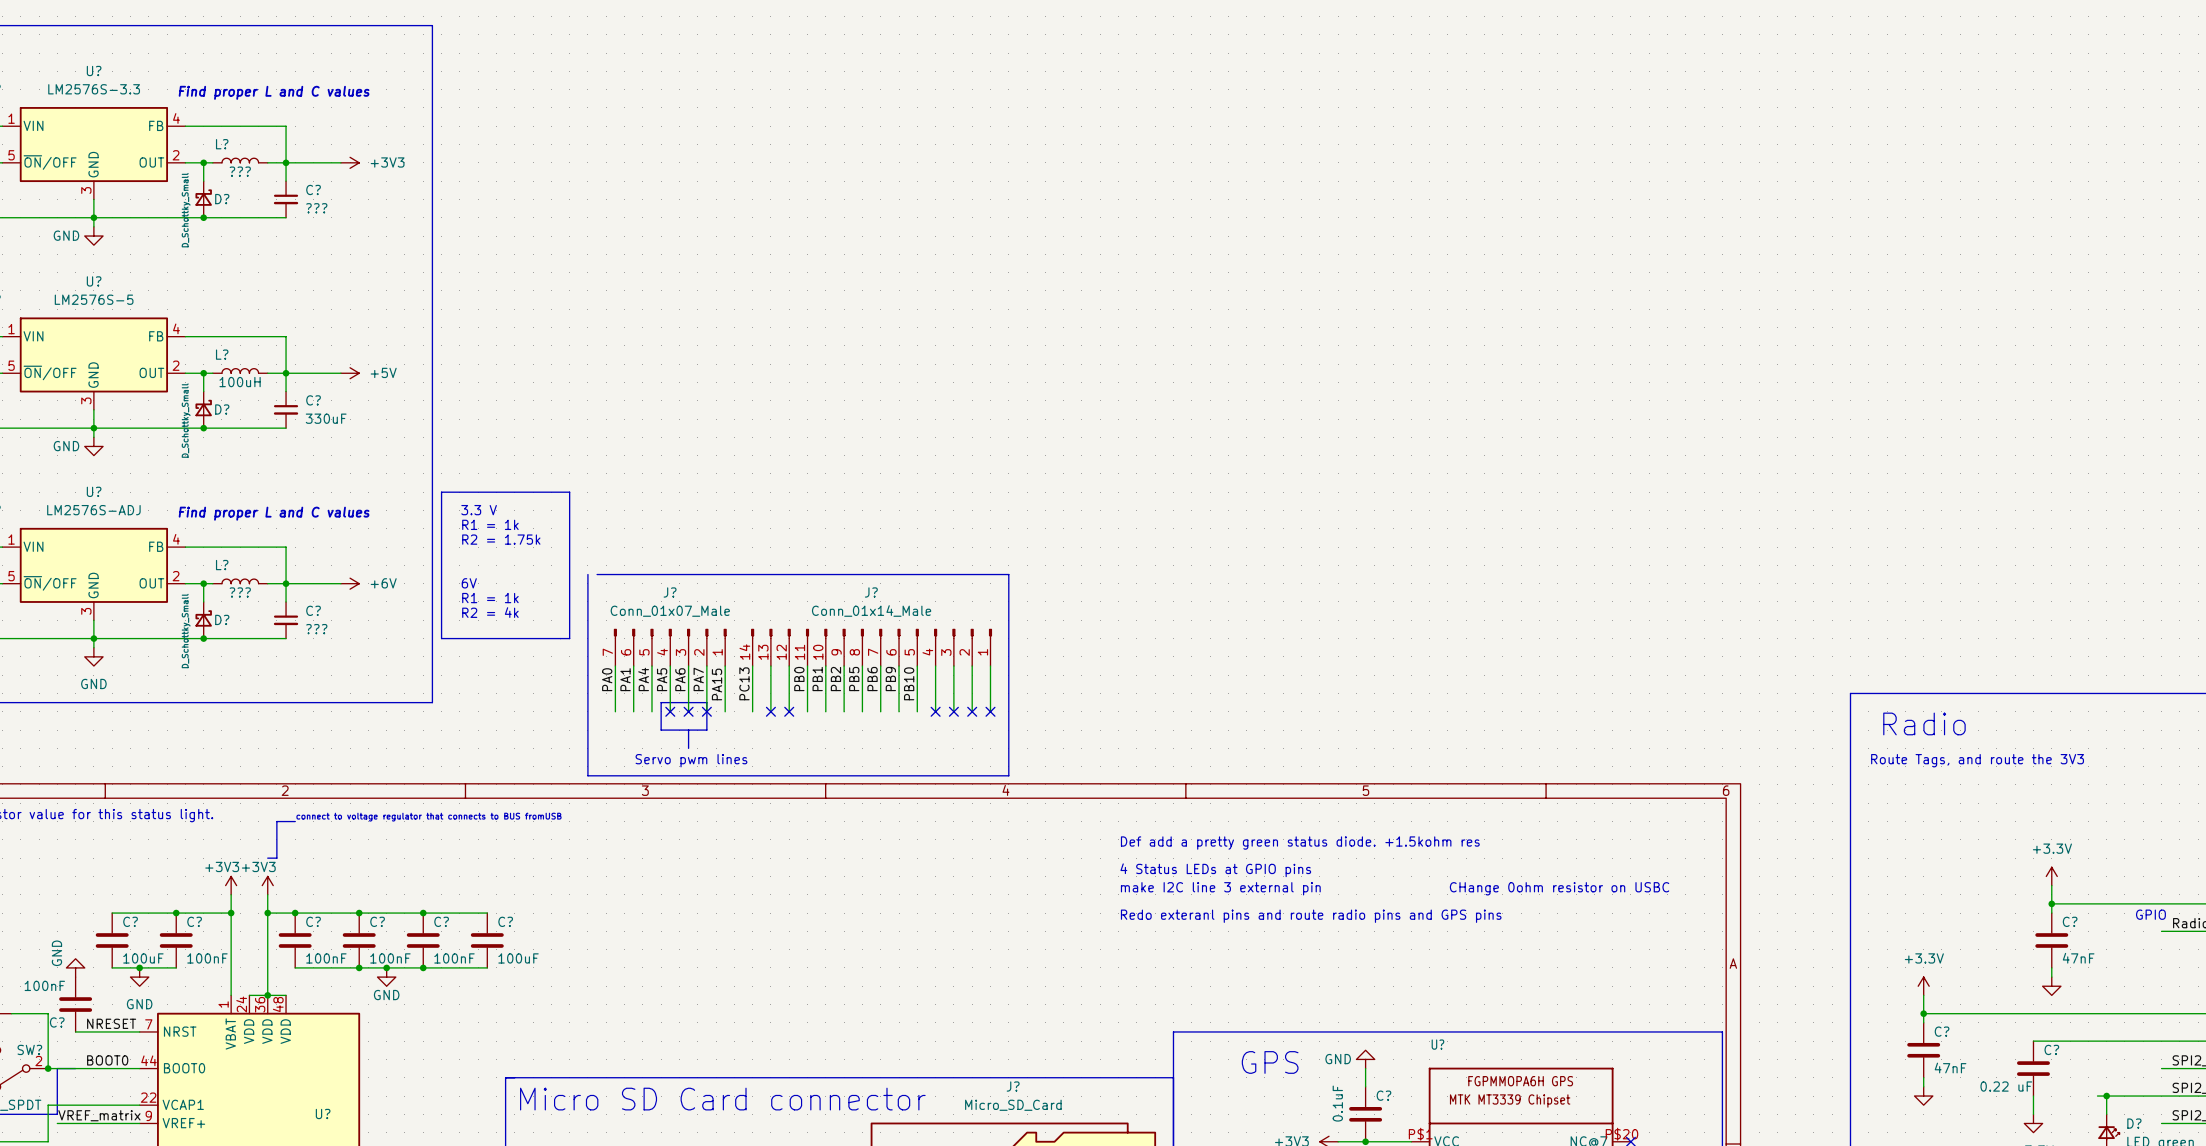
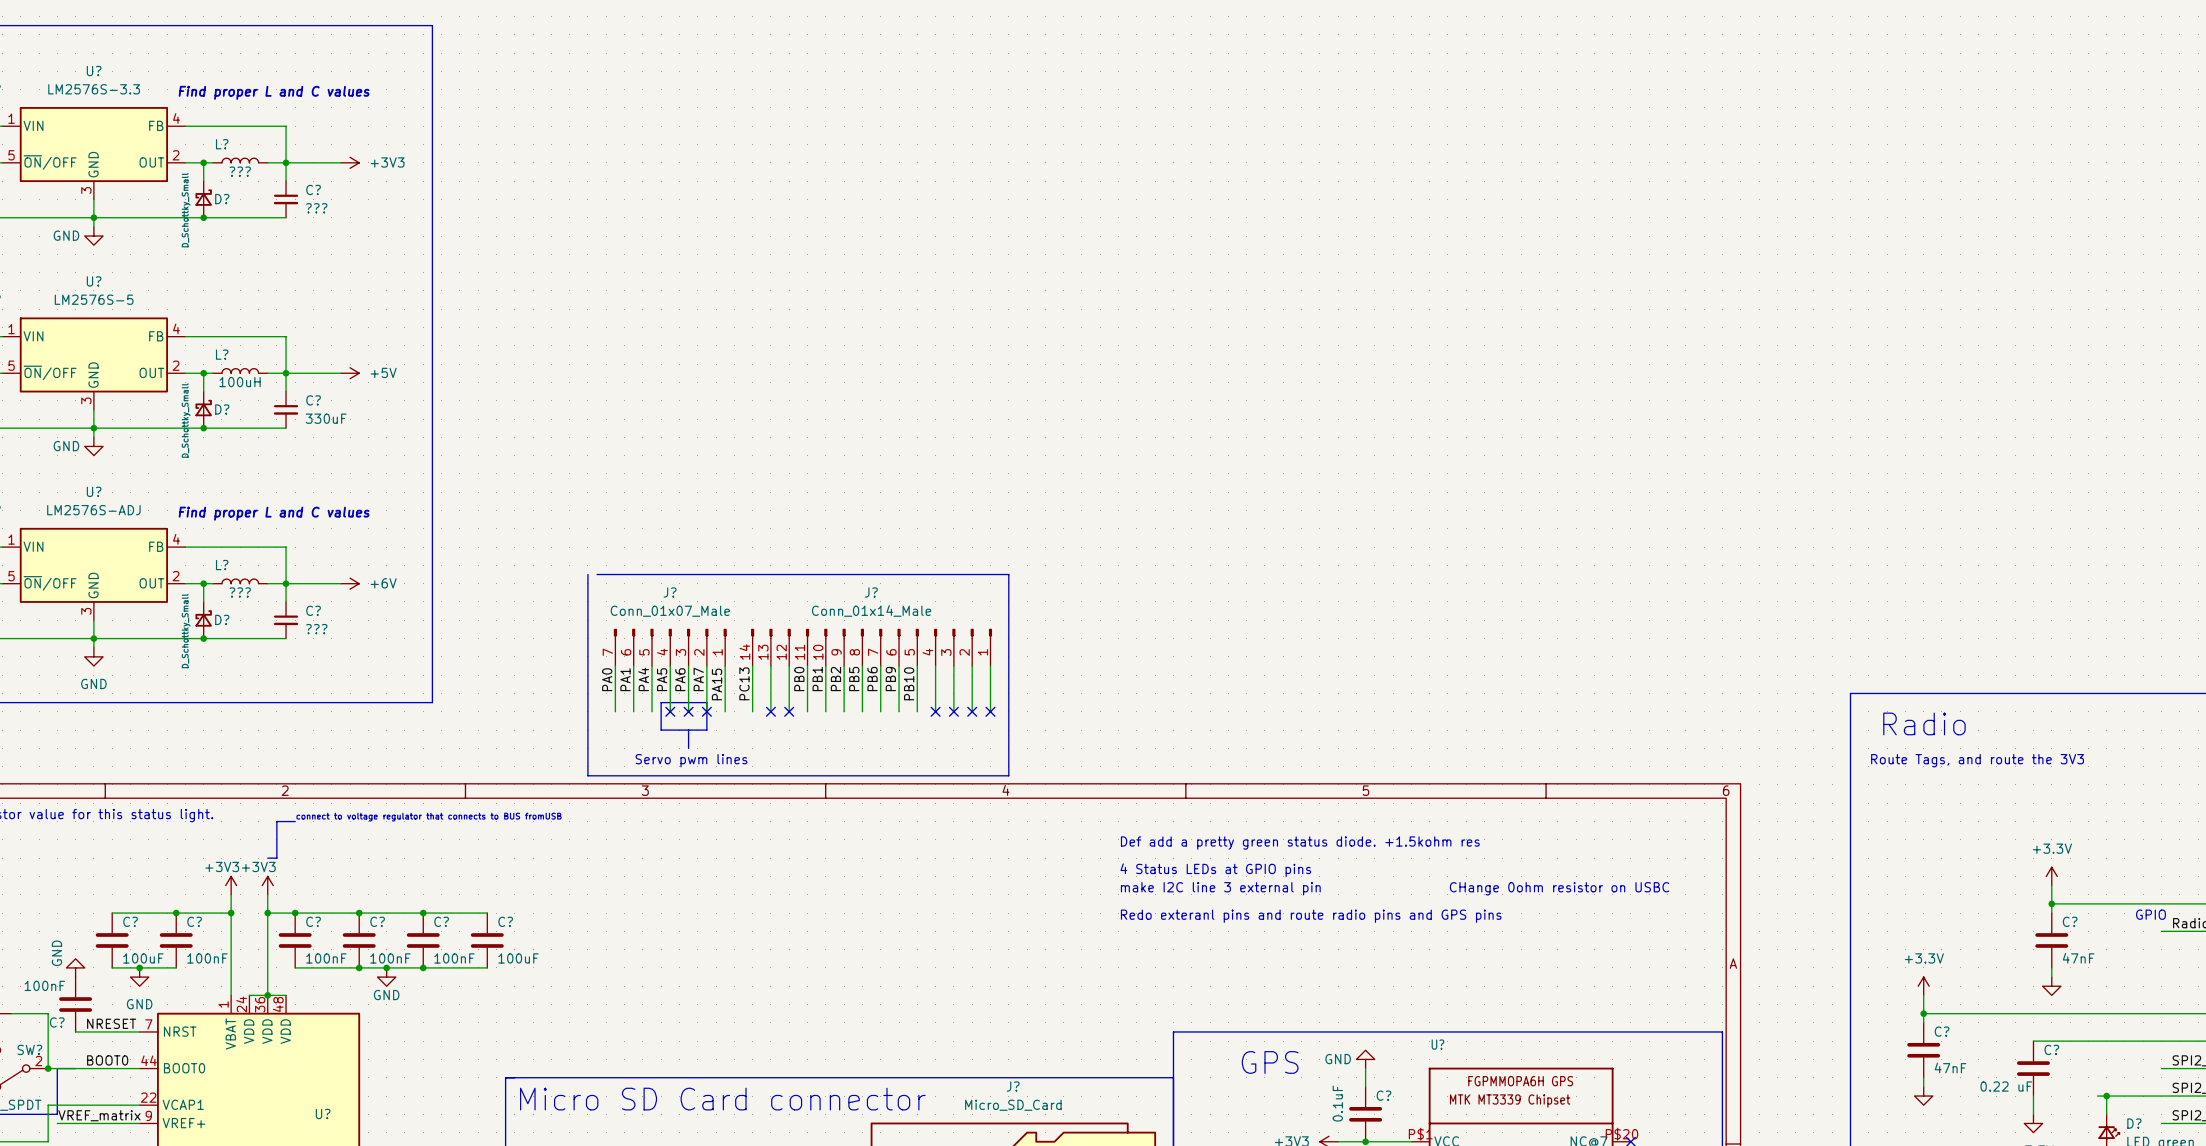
line: (441, 492) (569, 492) (569, 638) (441, 638) (441, 492) -> none
text: 3.3 V (479, 510) -> none
text: R1 = 1k (490, 524) -> none
text: R2 = 1.75k (501, 539) -> none
text: 6V (469, 583) -> none
text: R1 = 1k (490, 598) -> none
text: R2 = 4k (490, 612) -> none

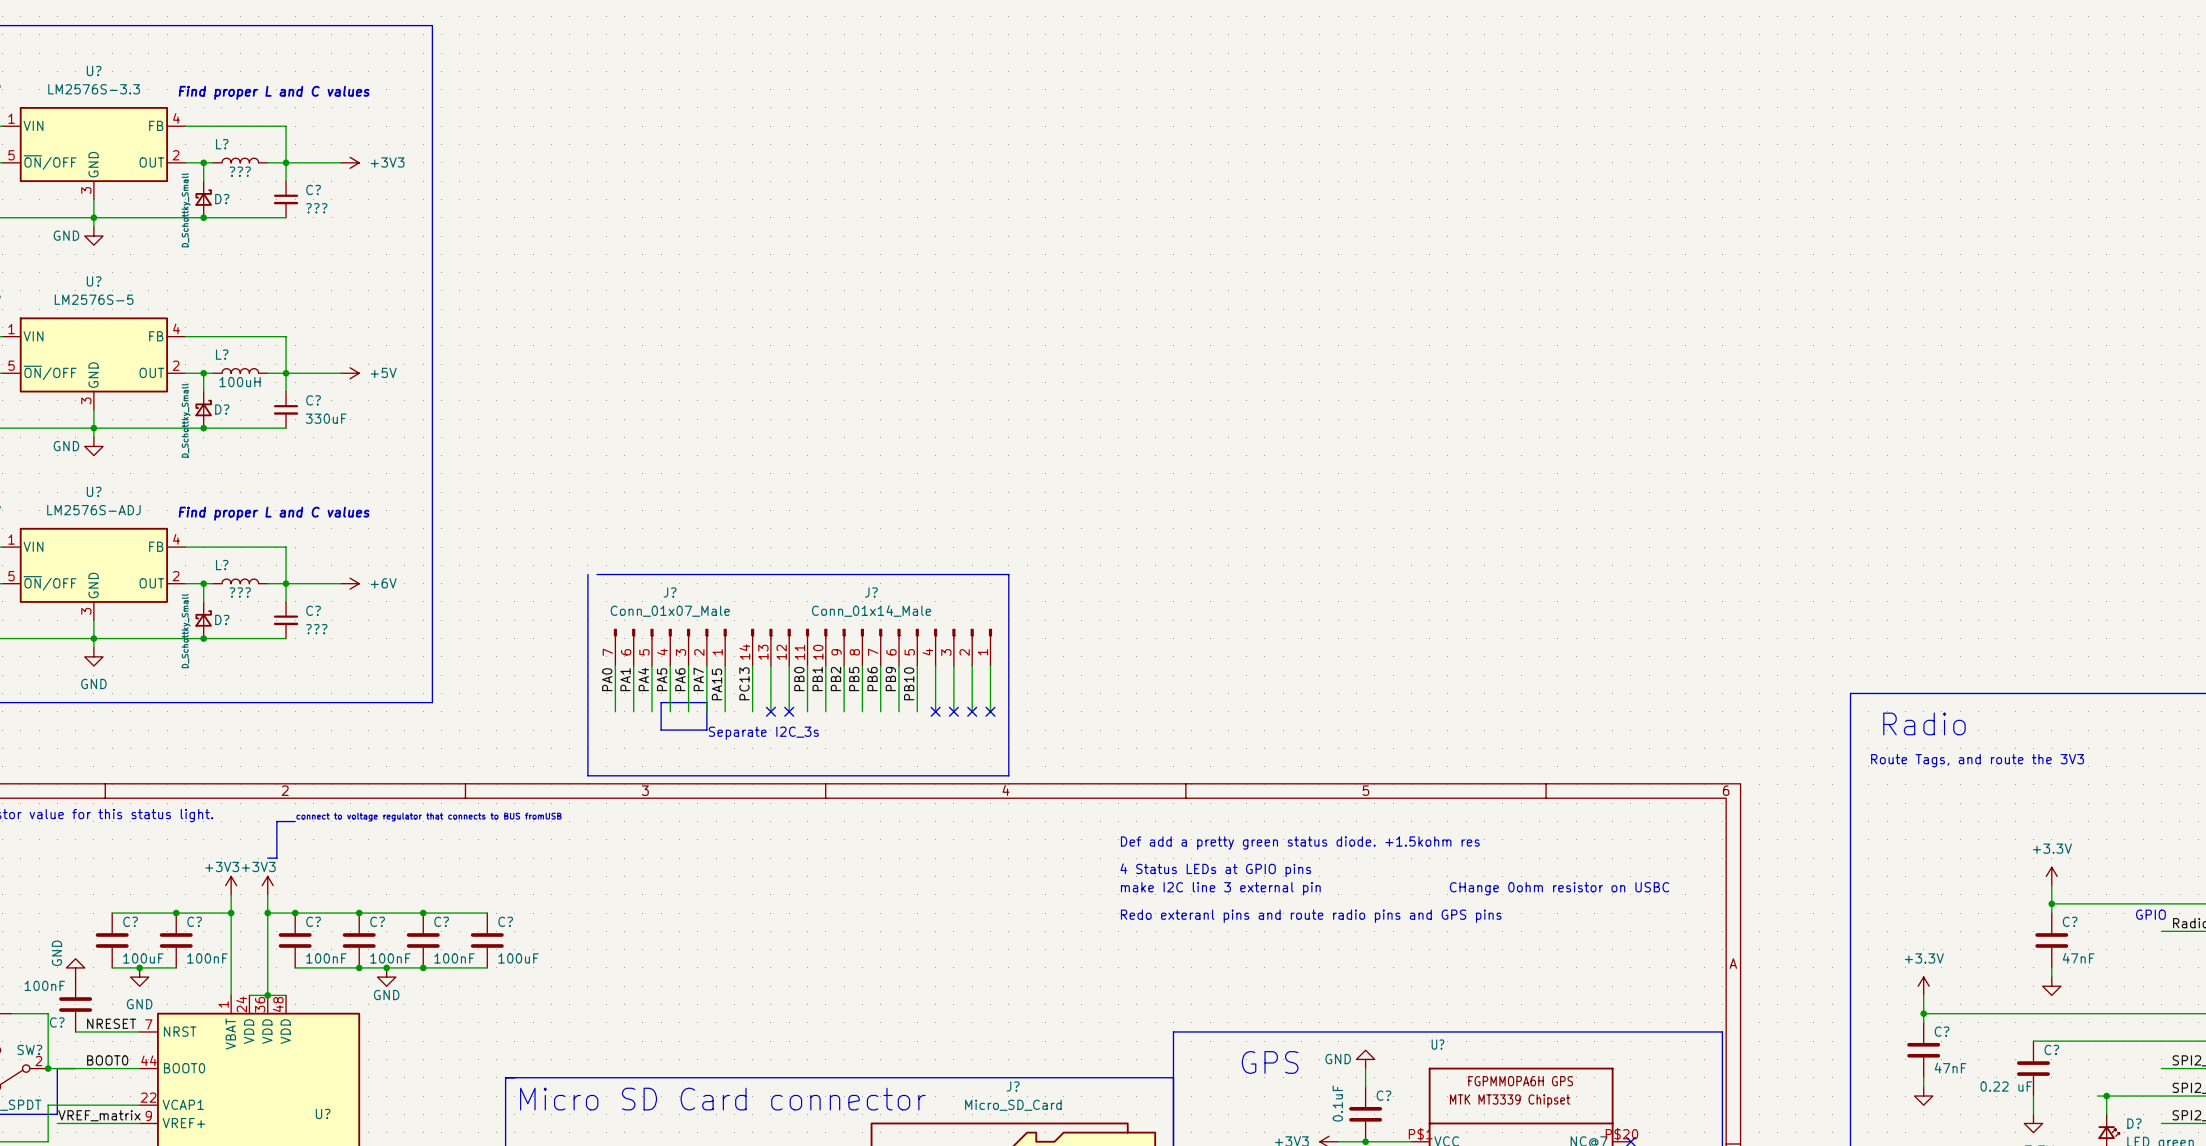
no-connect mark: (670, 711) -> none
no-connect mark: (688, 711) -> none
no-connect mark: (706, 711) -> none
line: (688, 730) (688, 748) -> none
text: none -> Separate I2C_3s (763, 733)
text: Servo pwm lines (691, 760) -> none

